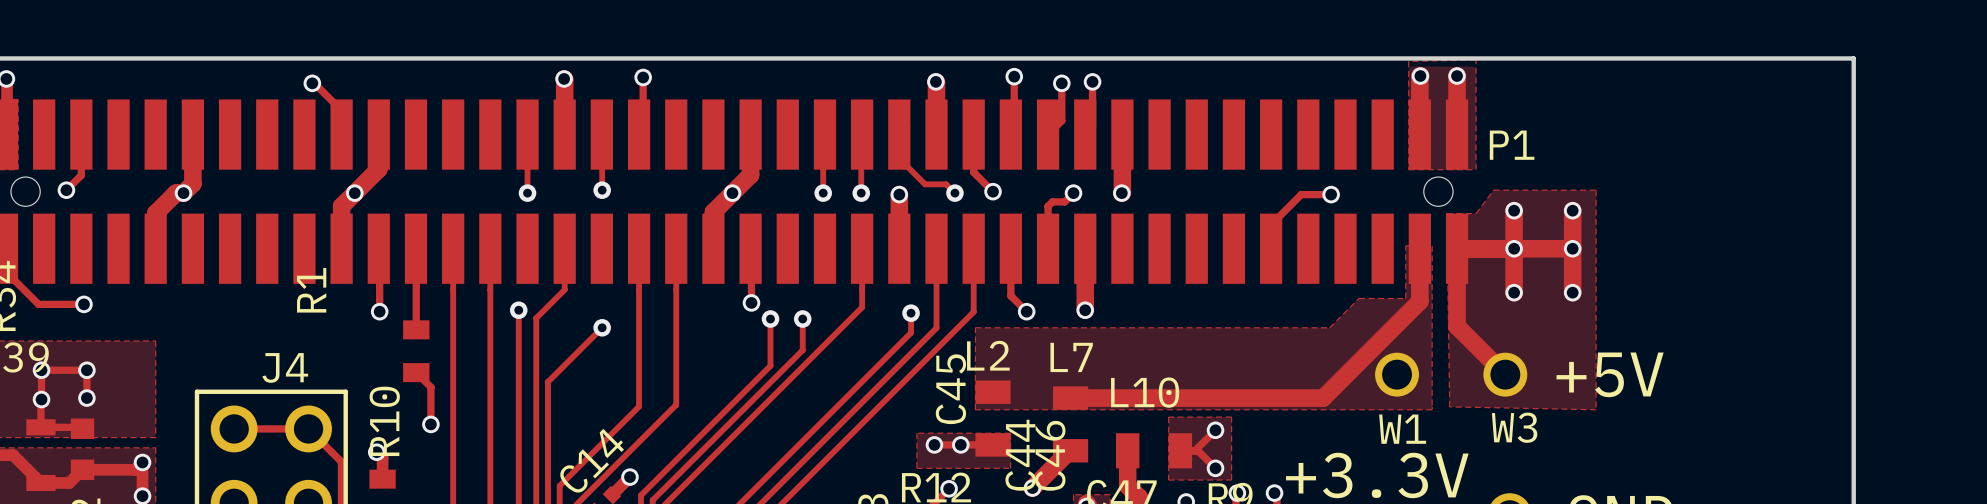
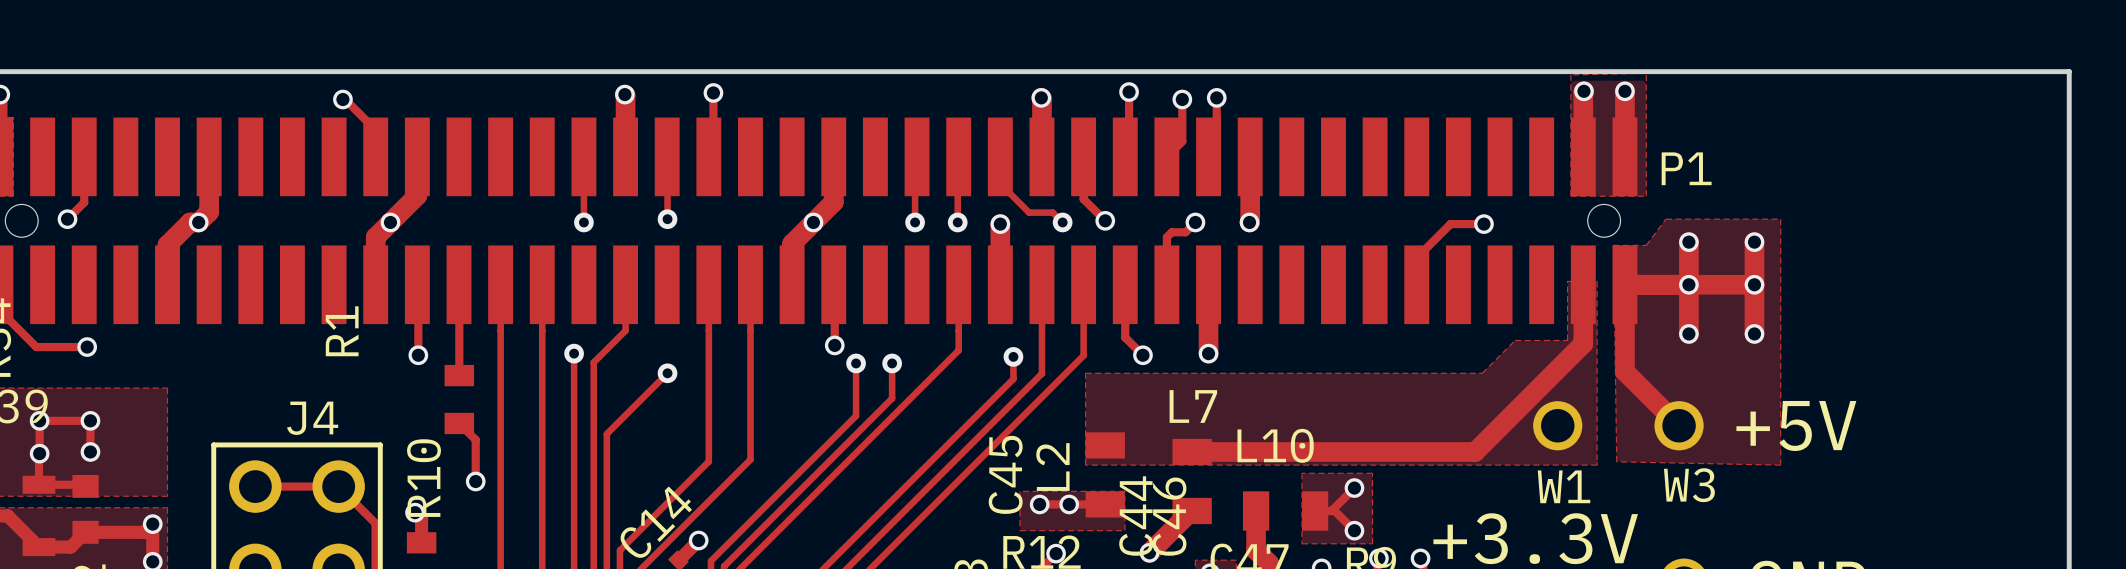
L2 name rotation: 0° (988, 355) -> 90° counterclockwise (1052, 467)
L2 name position: L2 (988, 355) -> L2 (1052, 467)
C45 name position: C45 (950, 389) -> C45 (1005, 474)

